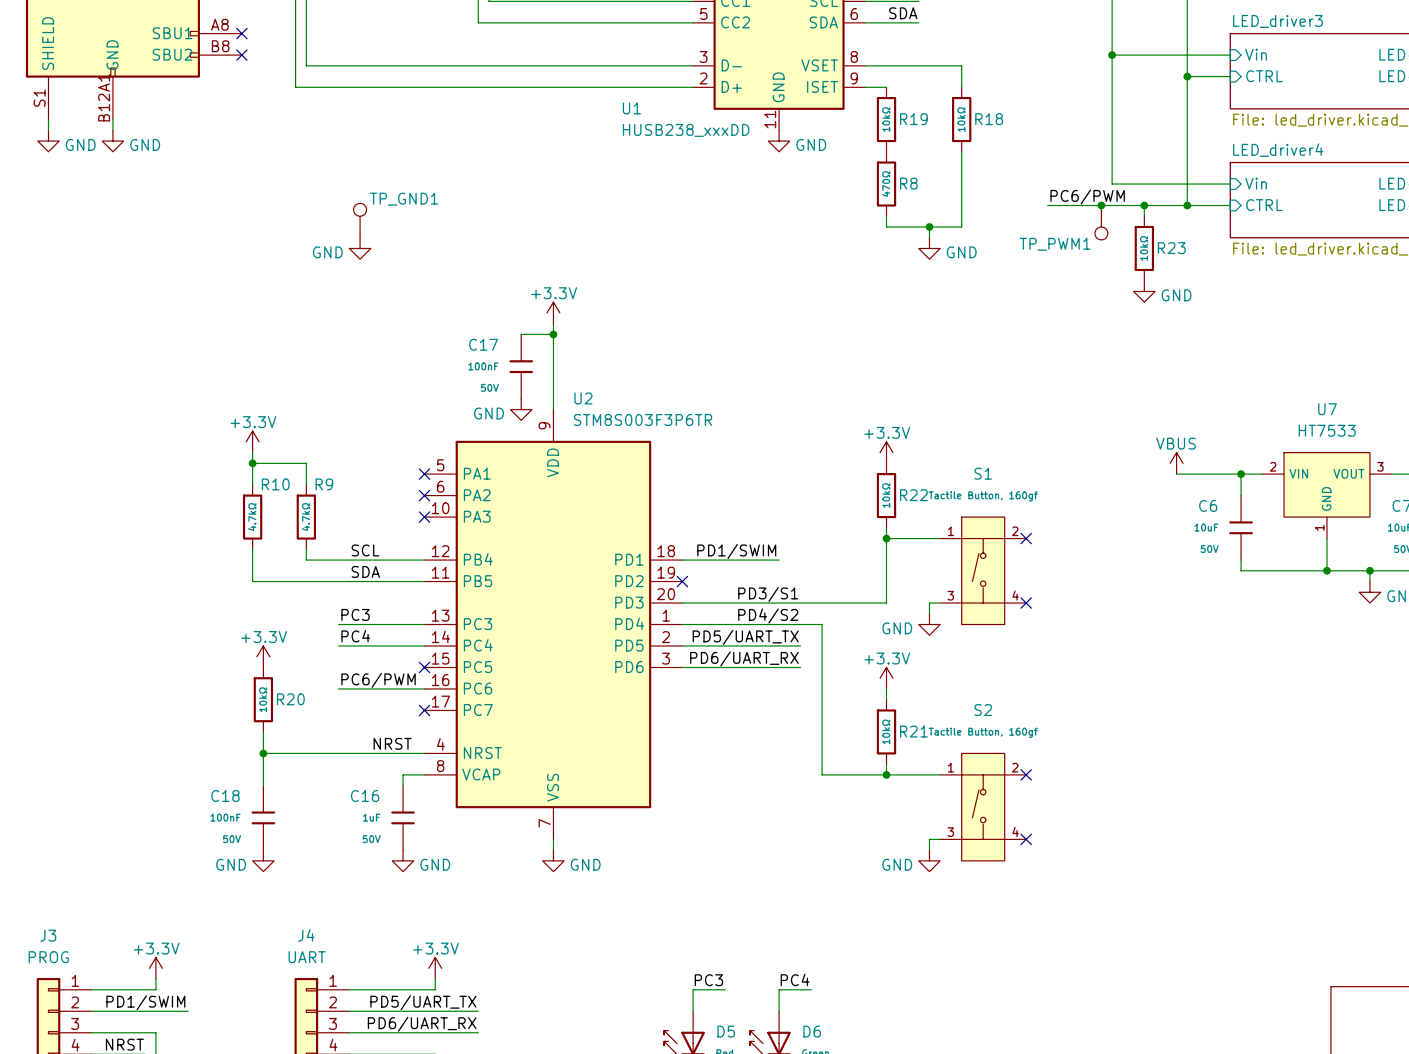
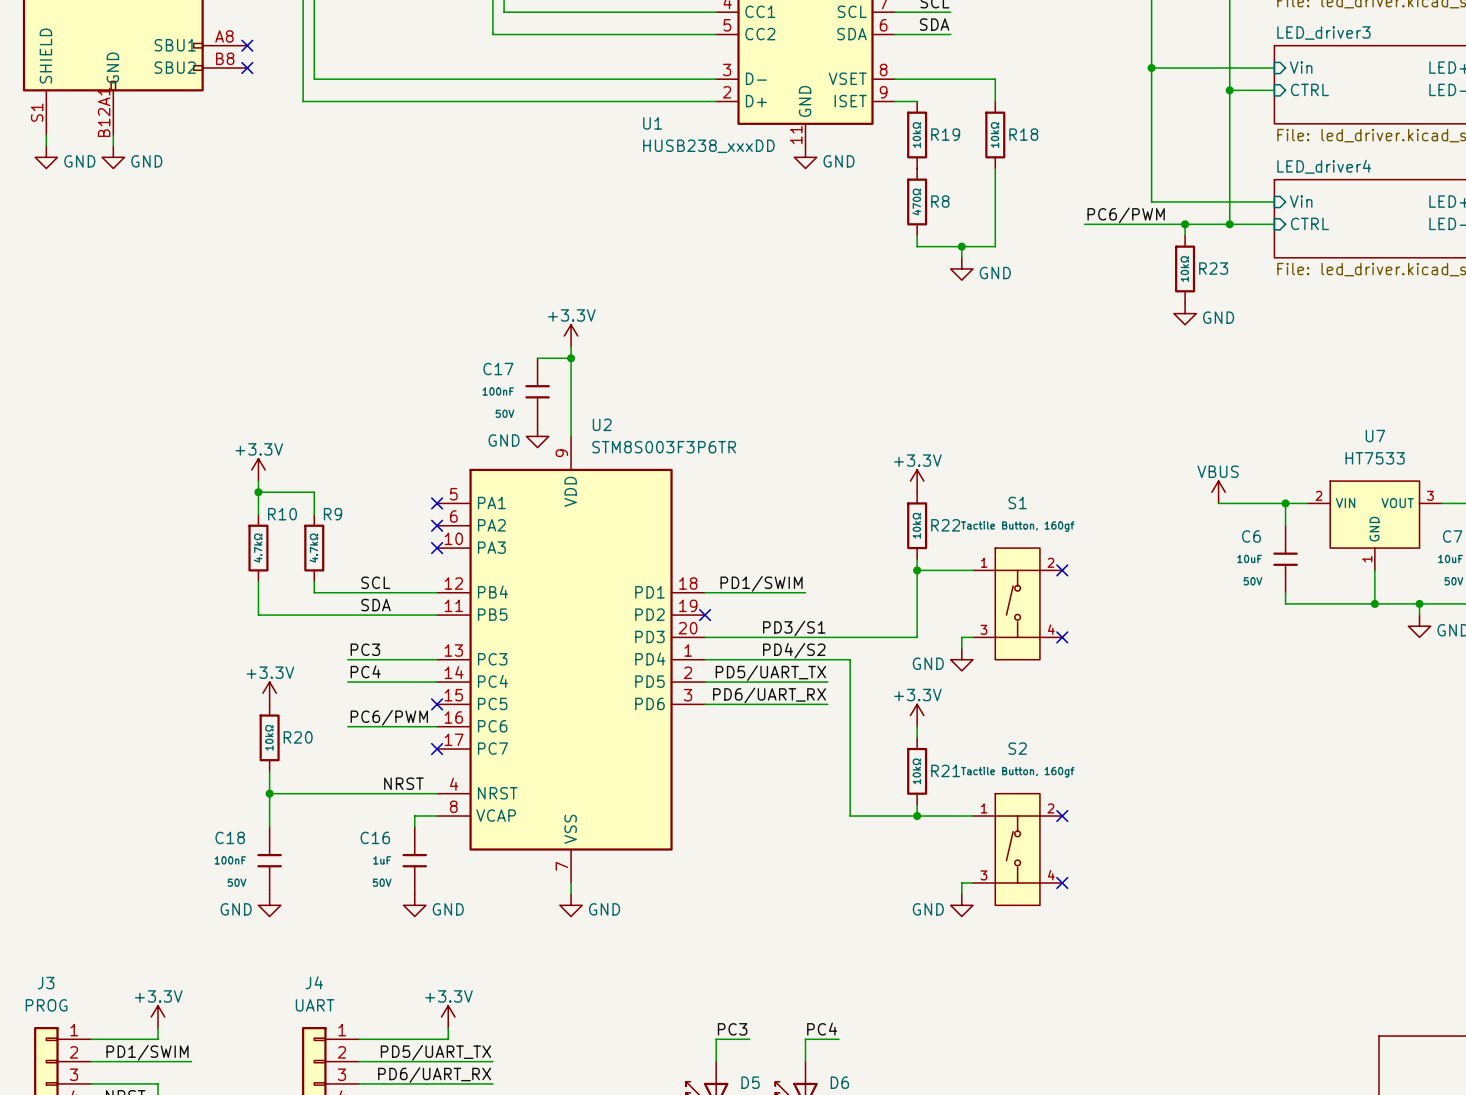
junction: (1101, 205) -> none
TP_GND1: (360, 220) -> none
TP_PWM1: (1101, 222) -> none
power symbol: GND (360, 248) -> none

